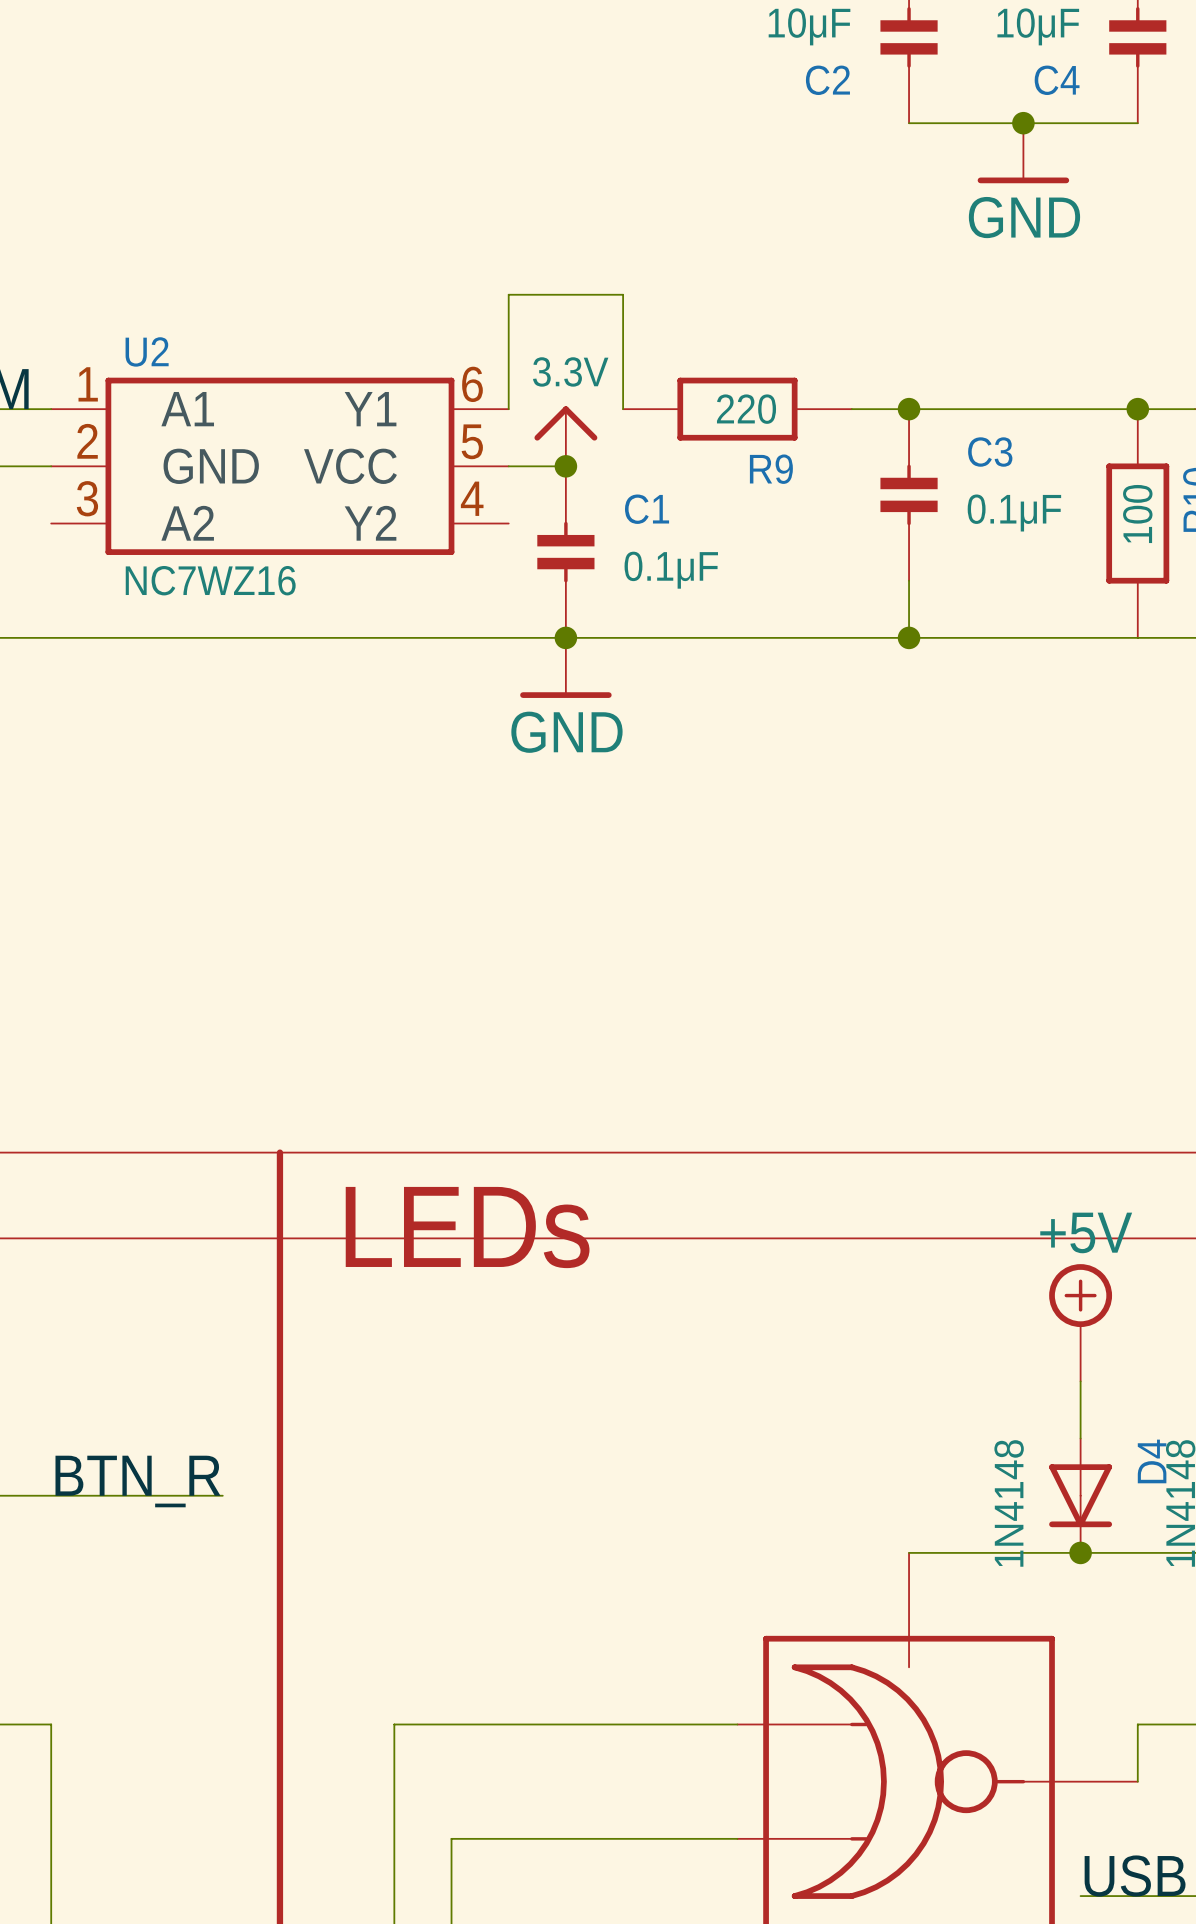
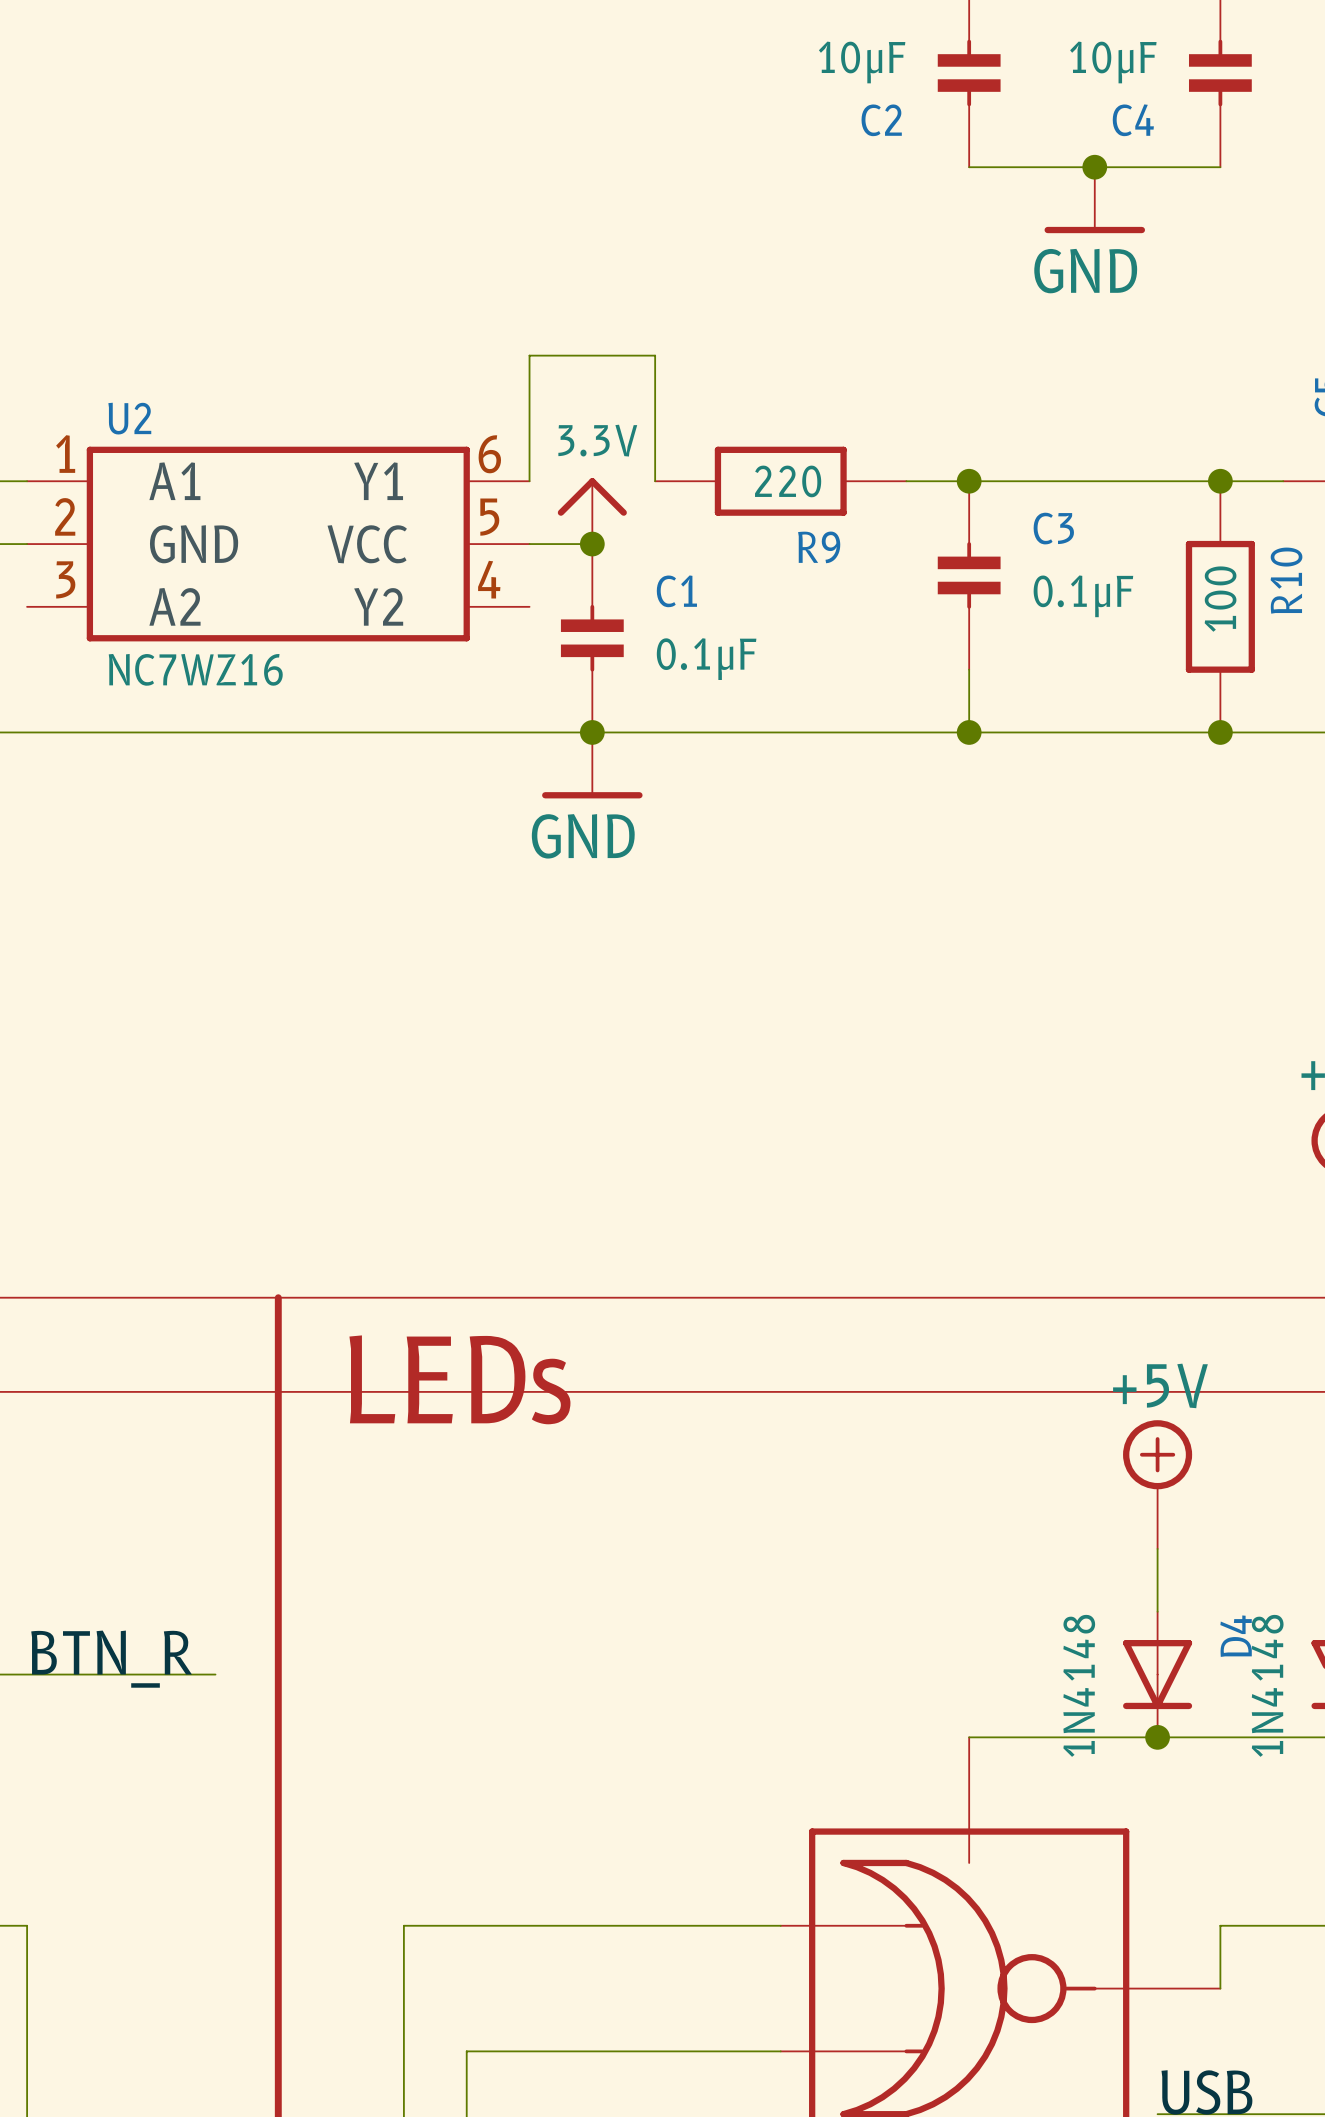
junction: none -> (1220, 732)

